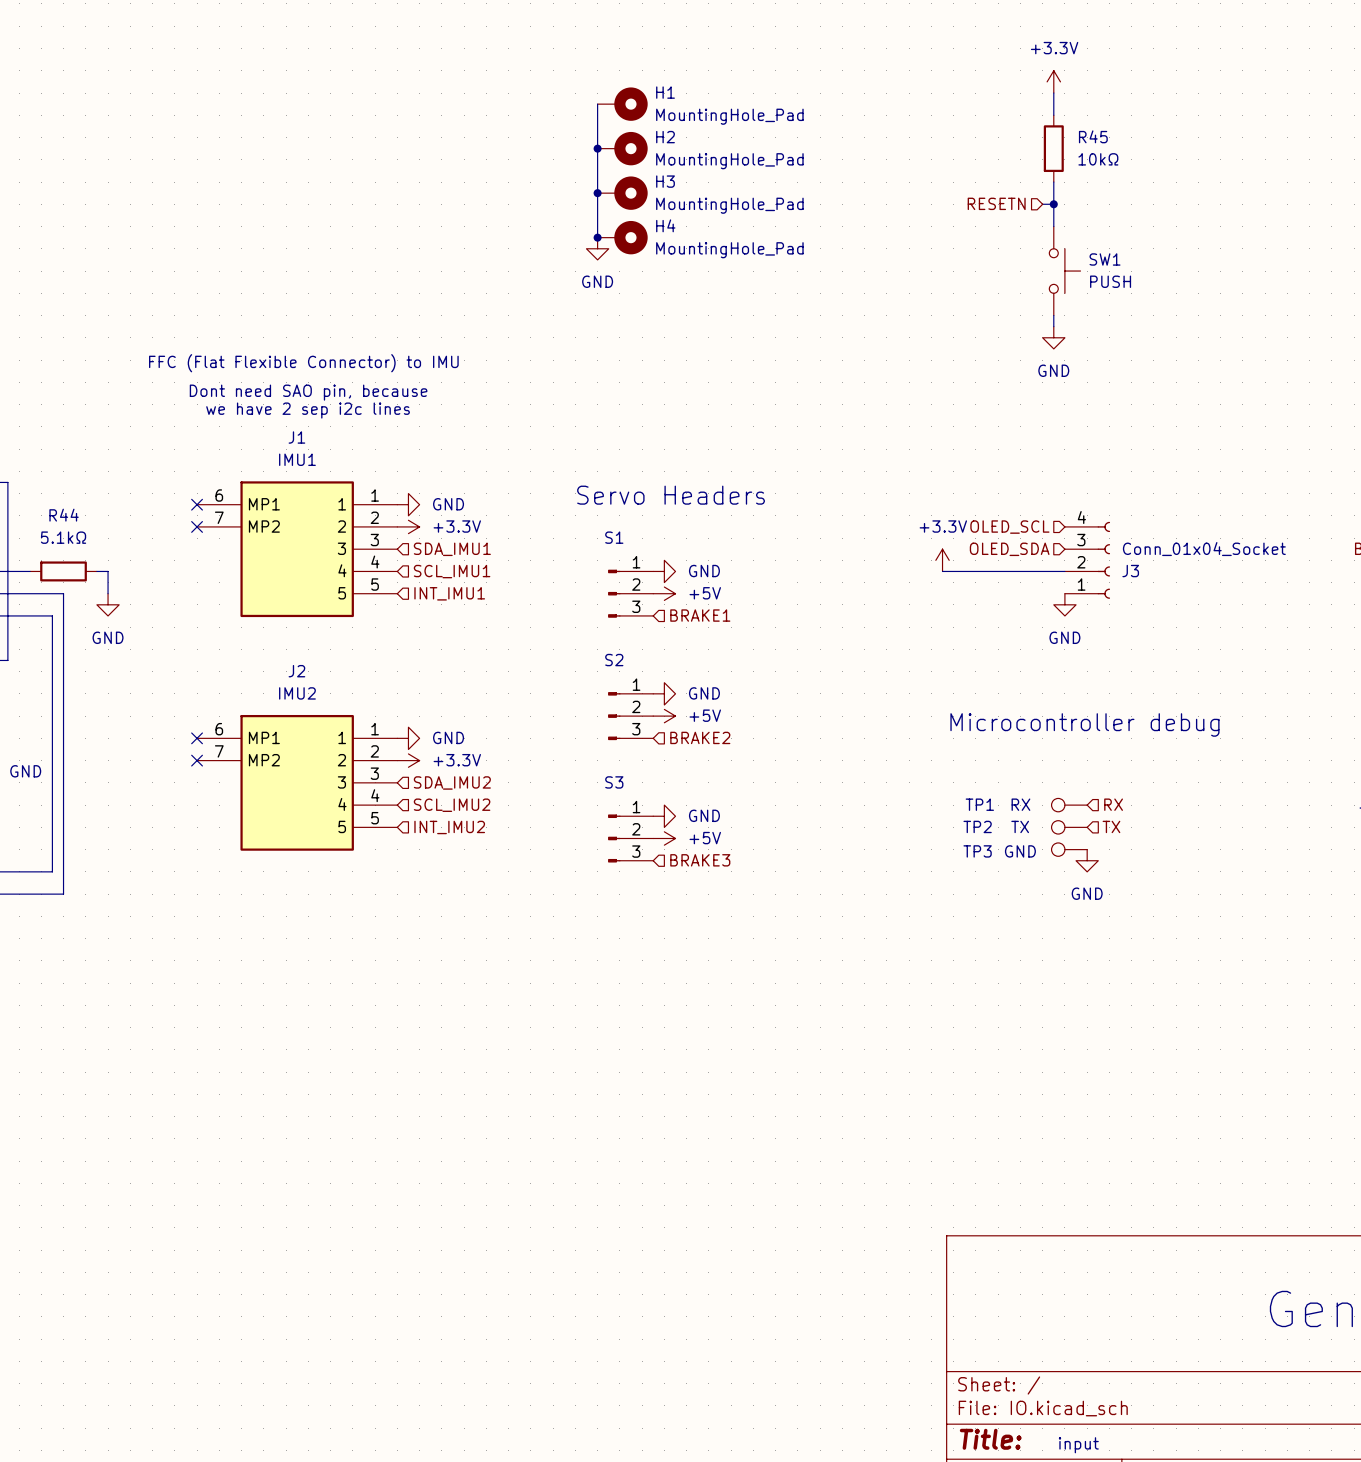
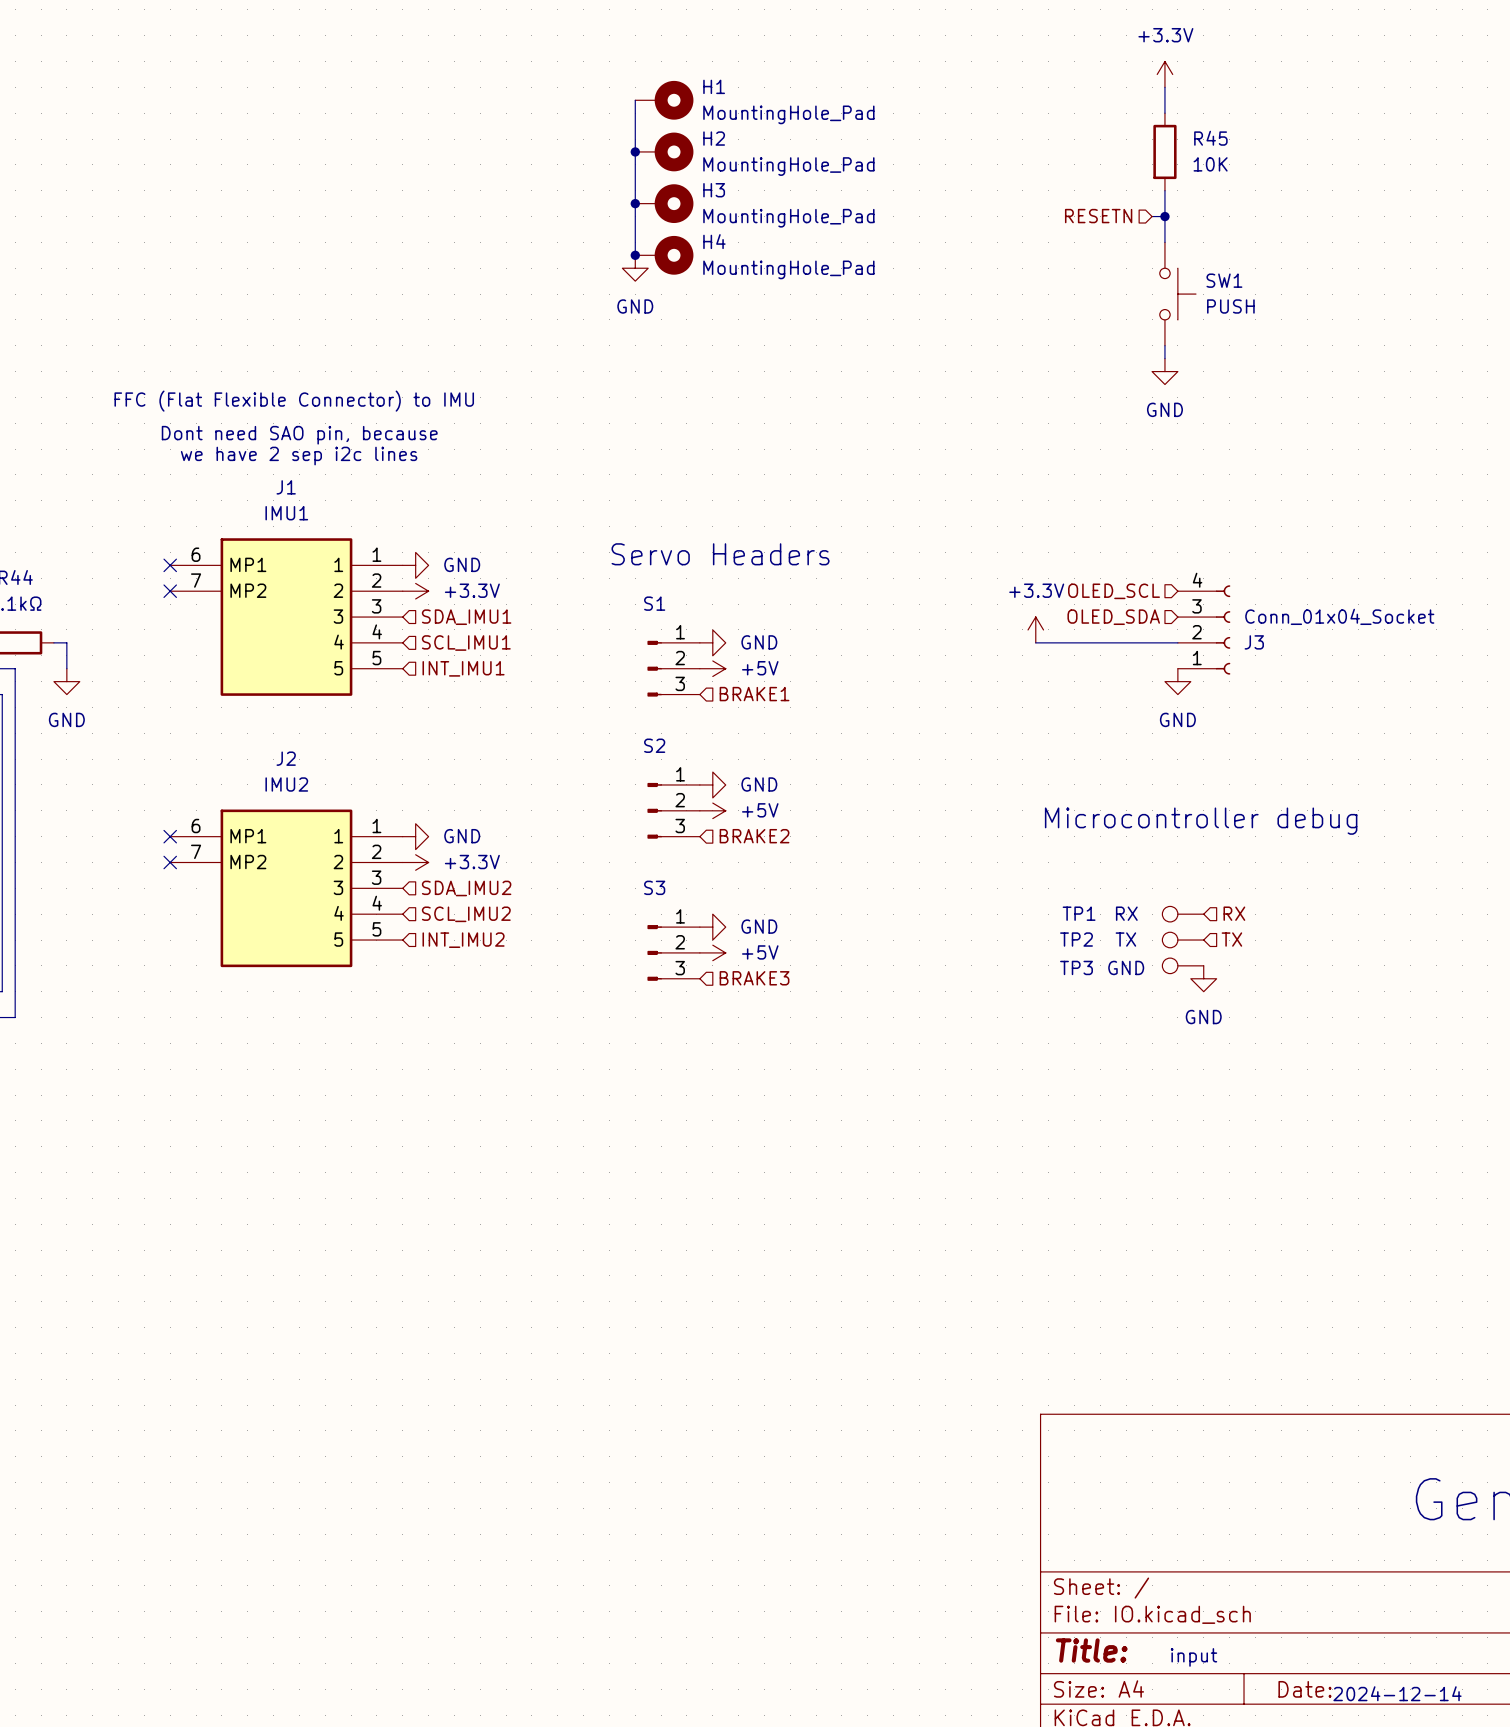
R45 value: 10kΩ (1098, 159) -> 10K (1210, 164)

